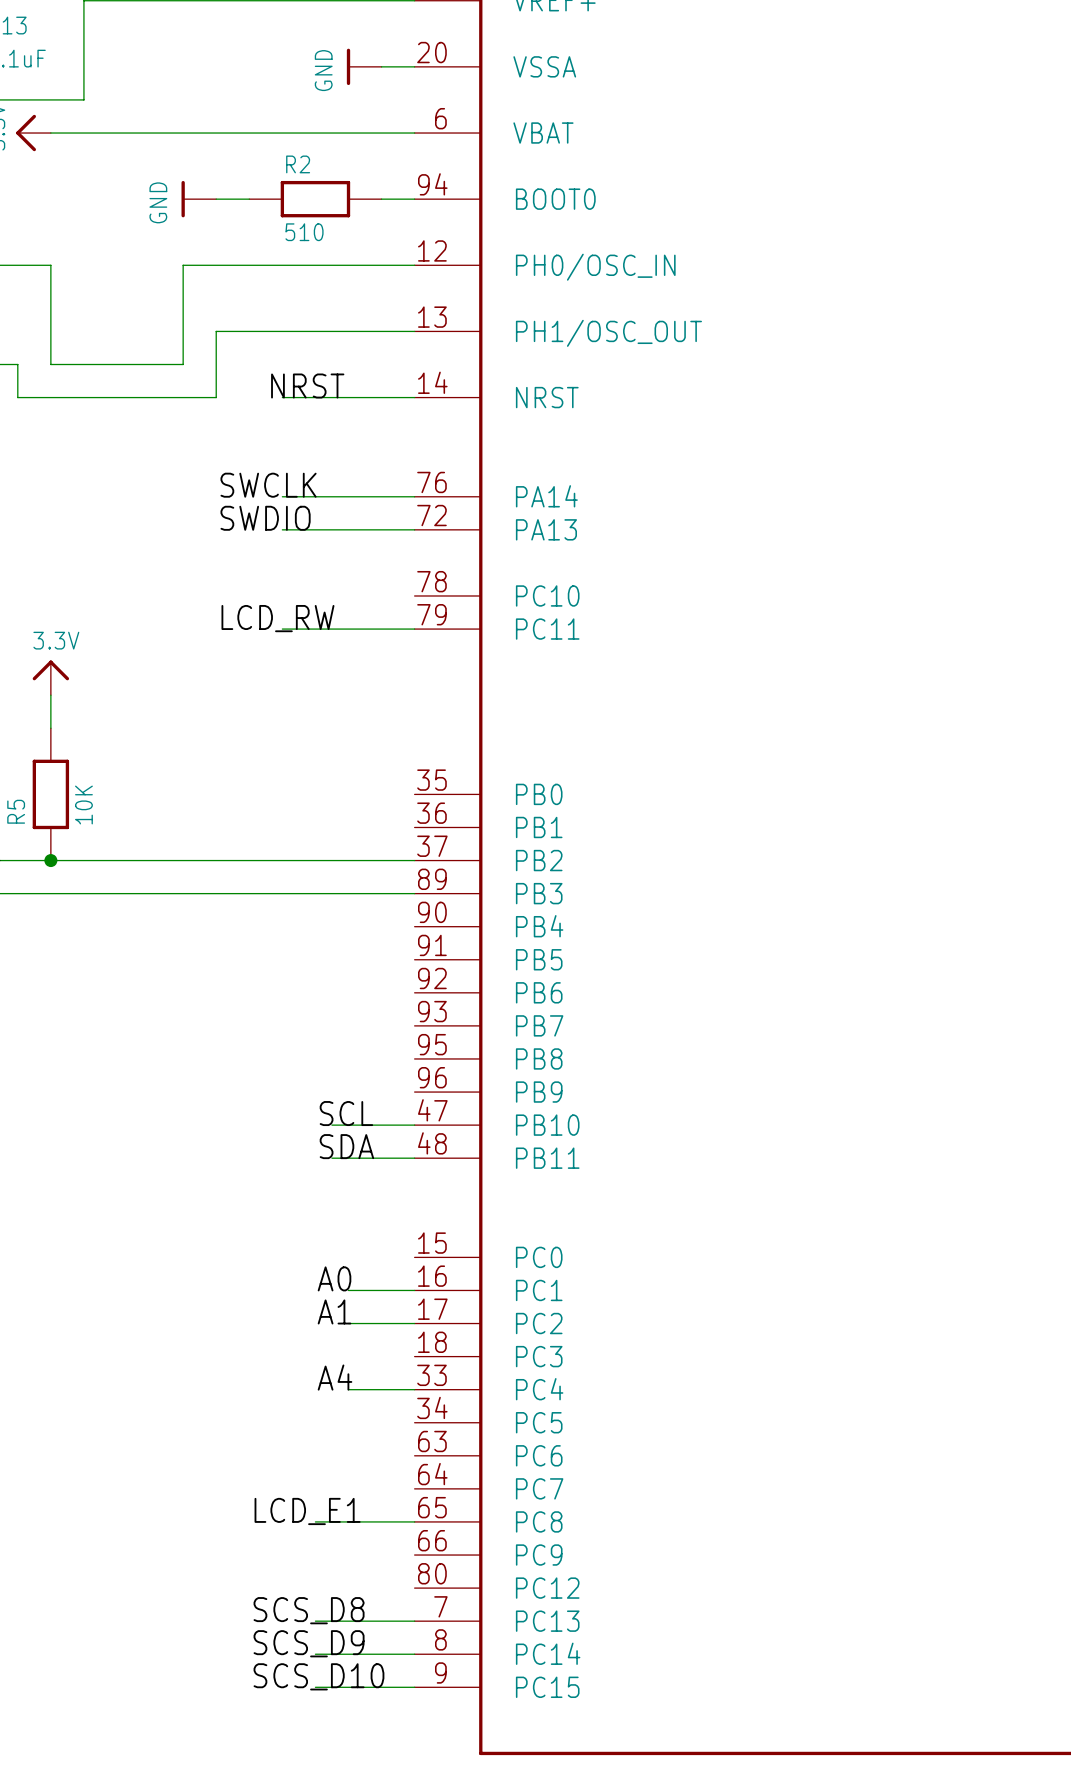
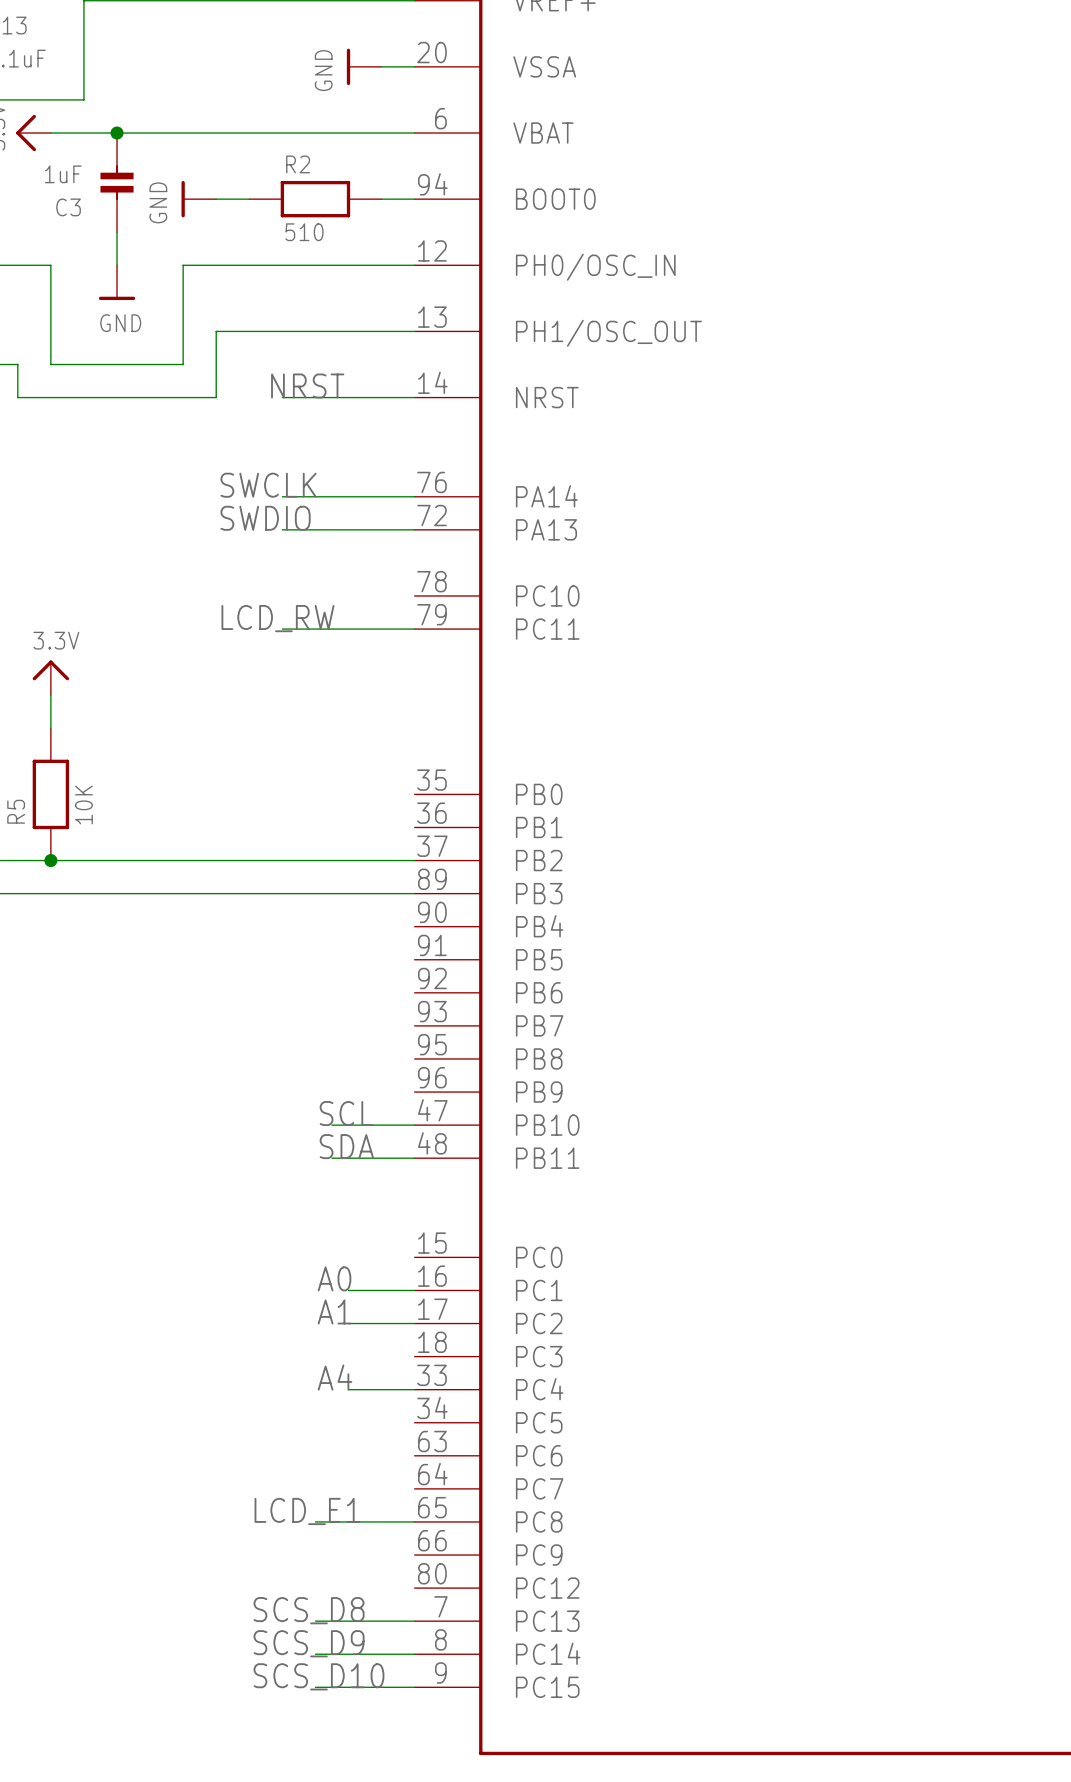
junction: none -> (117, 133)
C3: none -> 1uF (117, 182)
wire: none -> (117, 232) (117, 265)
power symbol: none -> GND (117, 282)

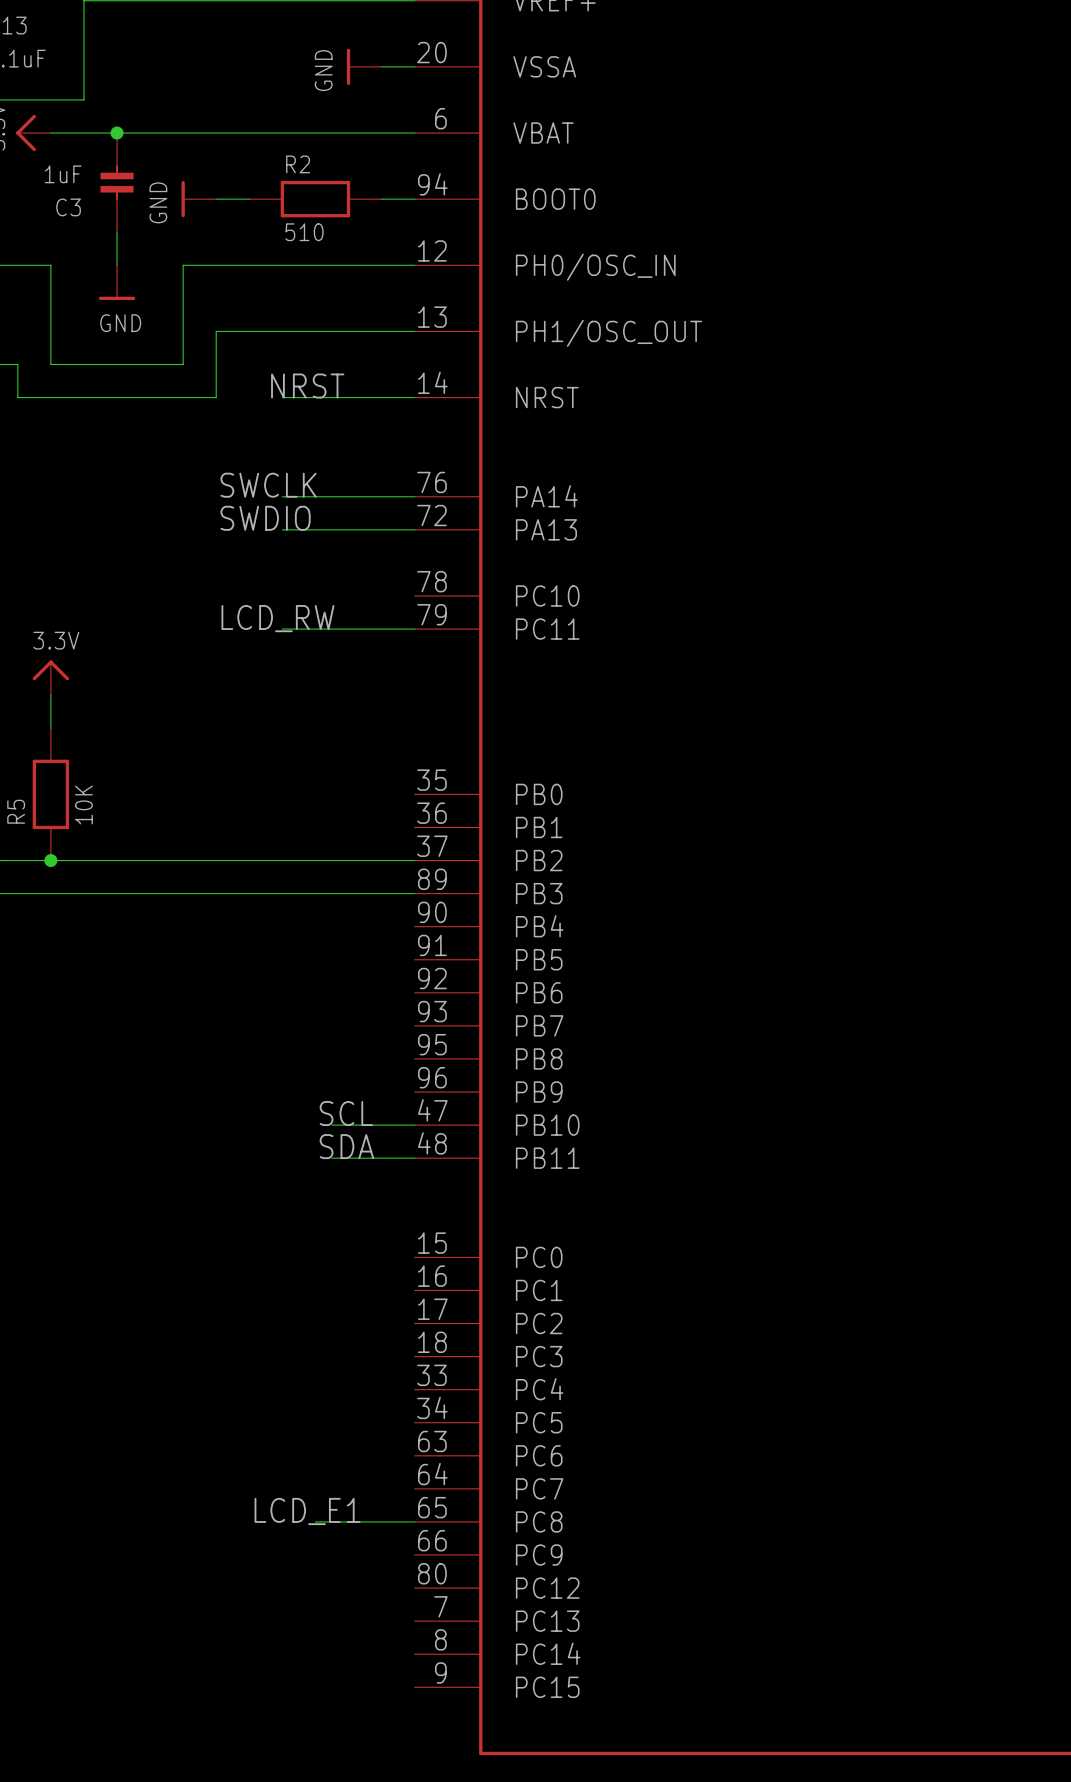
label: A0 (334, 1278) -> none
wire: (348, 1290) (414, 1290) -> none
label: A1 (334, 1311) -> none
wire: (348, 1323) (414, 1323) -> none
label: A4 (335, 1377) -> none
wire: (348, 1389) (414, 1389) -> none
label: SCS_D8 (309, 1610) -> none
wire: (315, 1621) (414, 1621) -> none
label: SCS_D9 (309, 1643) -> none
wire: (315, 1654) (414, 1654) -> none
label: SCS_D10 (318, 1676) -> none
wire: (315, 1687) (414, 1687) -> none

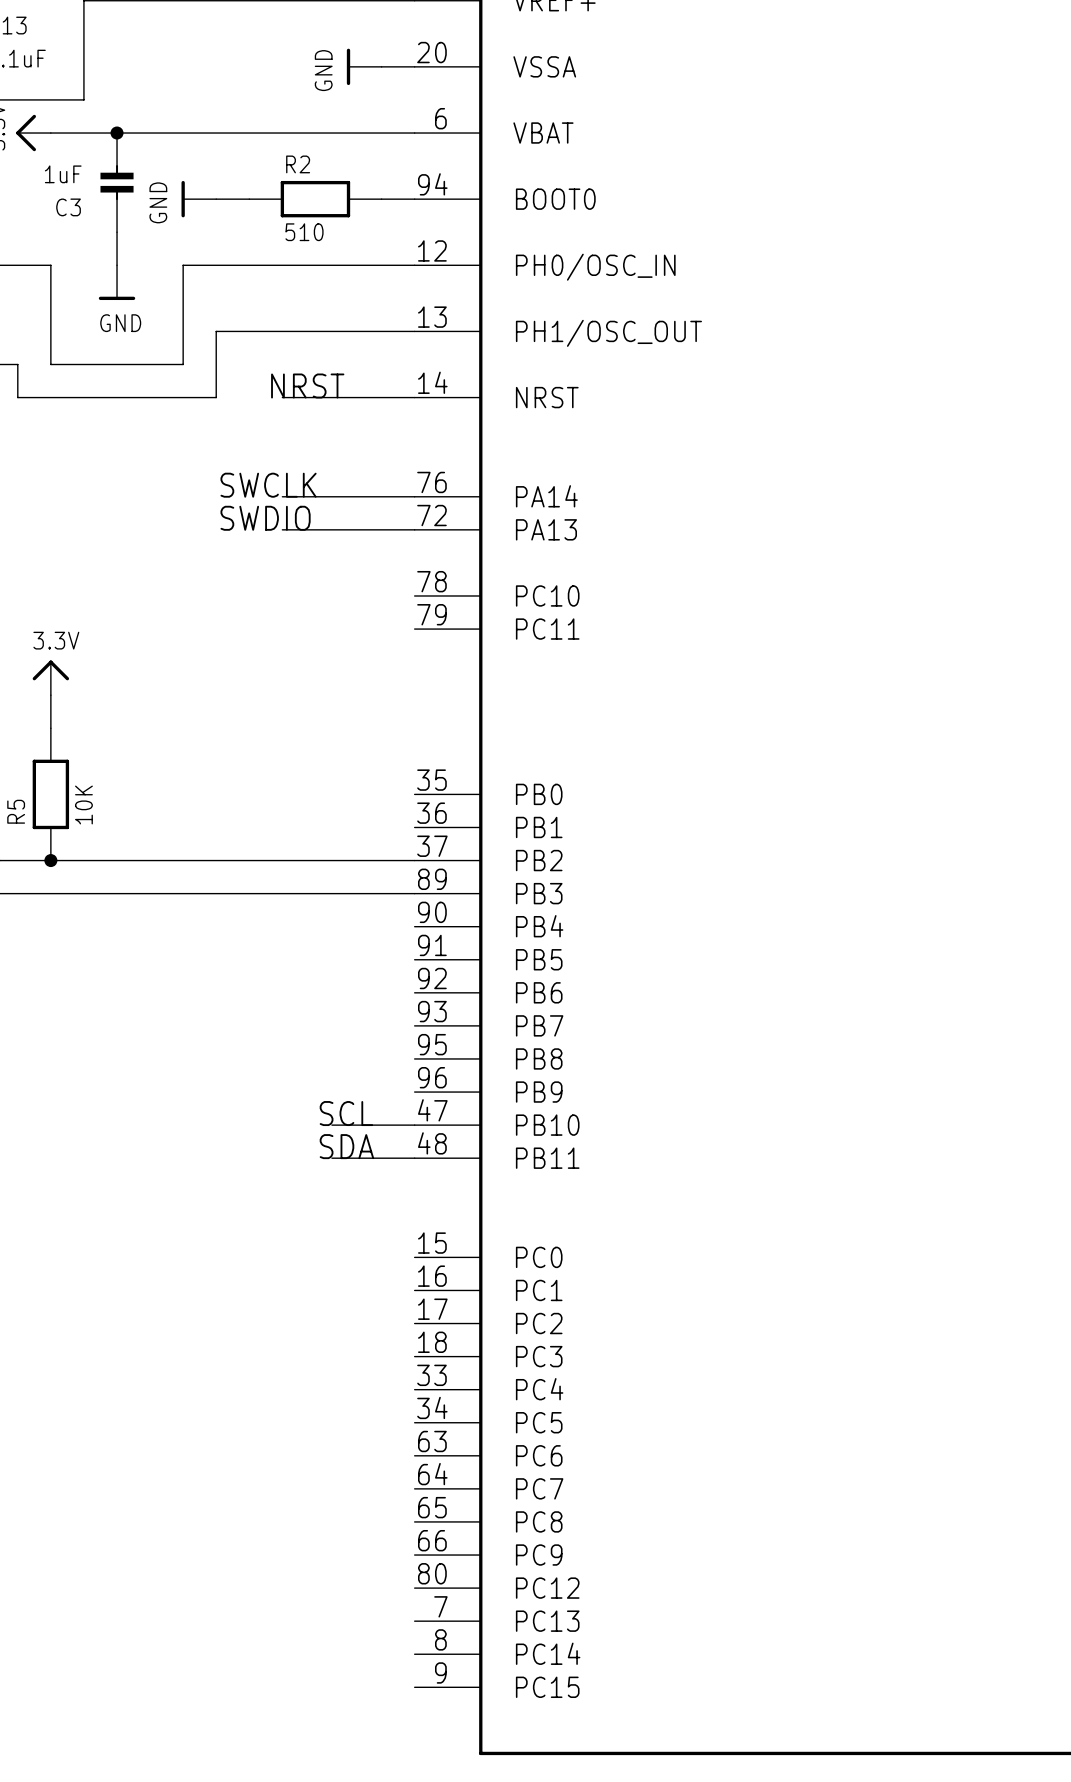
label: LCD_RW (277, 618) -> none
wire: (282, 629) (414, 629) -> none
label: LCD_E1 (307, 1511) -> none
wire: (315, 1521) (414, 1521) -> none

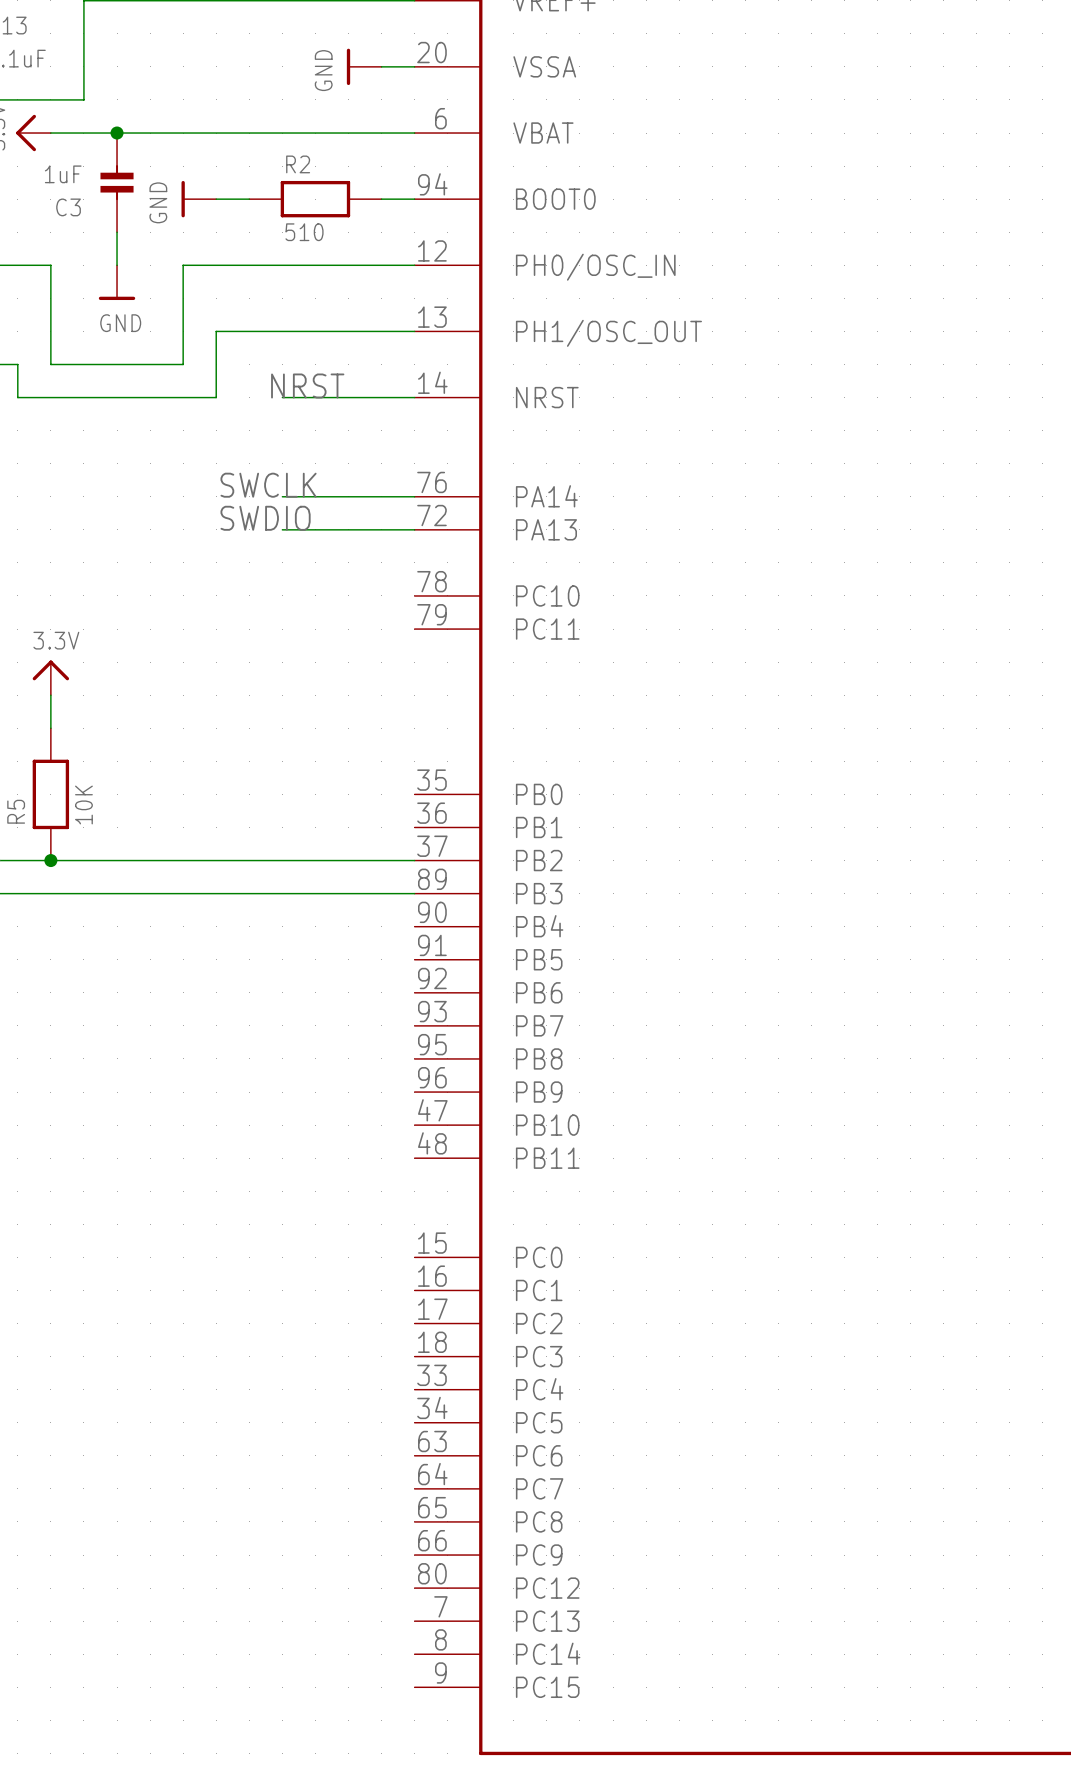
label: SCL (346, 1113) -> none
wire: (331, 1125) (414, 1125) -> none
label: SDA (346, 1146) -> none
wire: (331, 1158) (414, 1158) -> none

